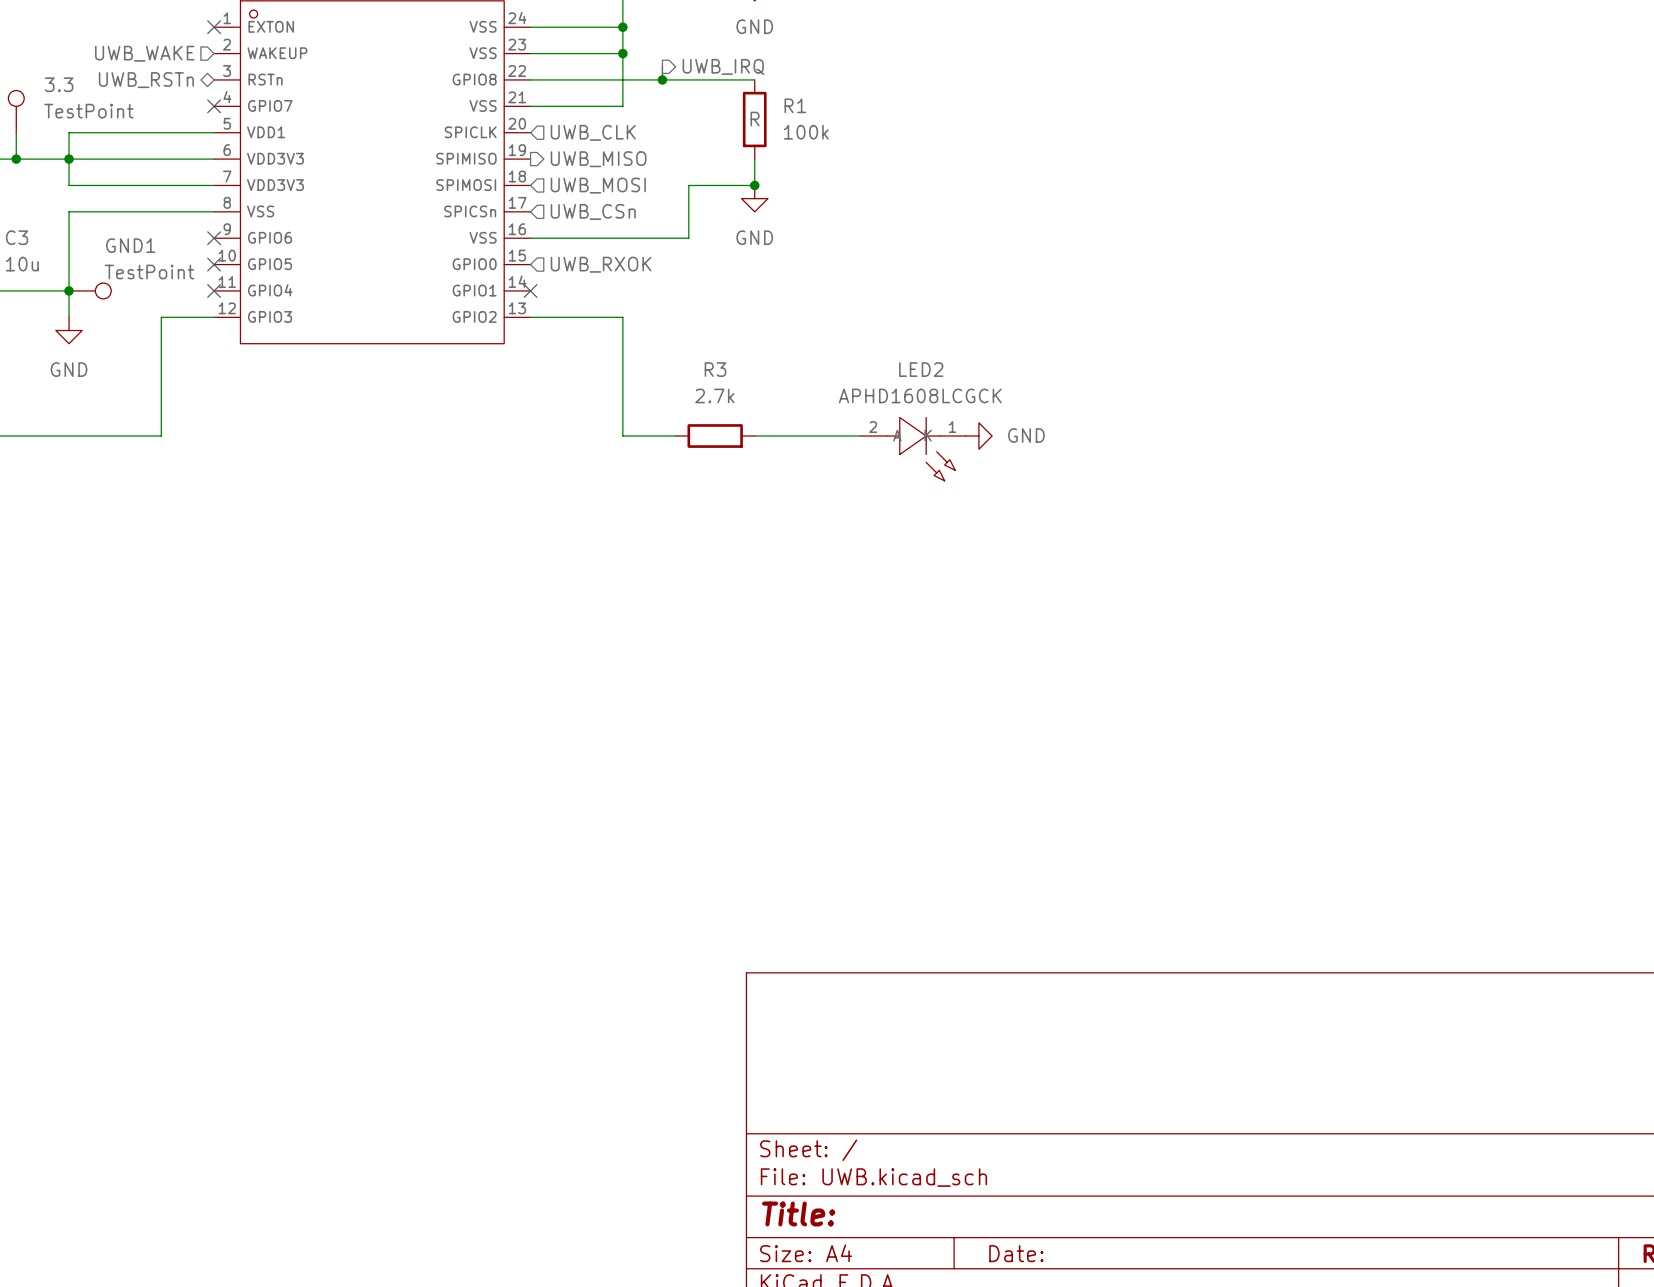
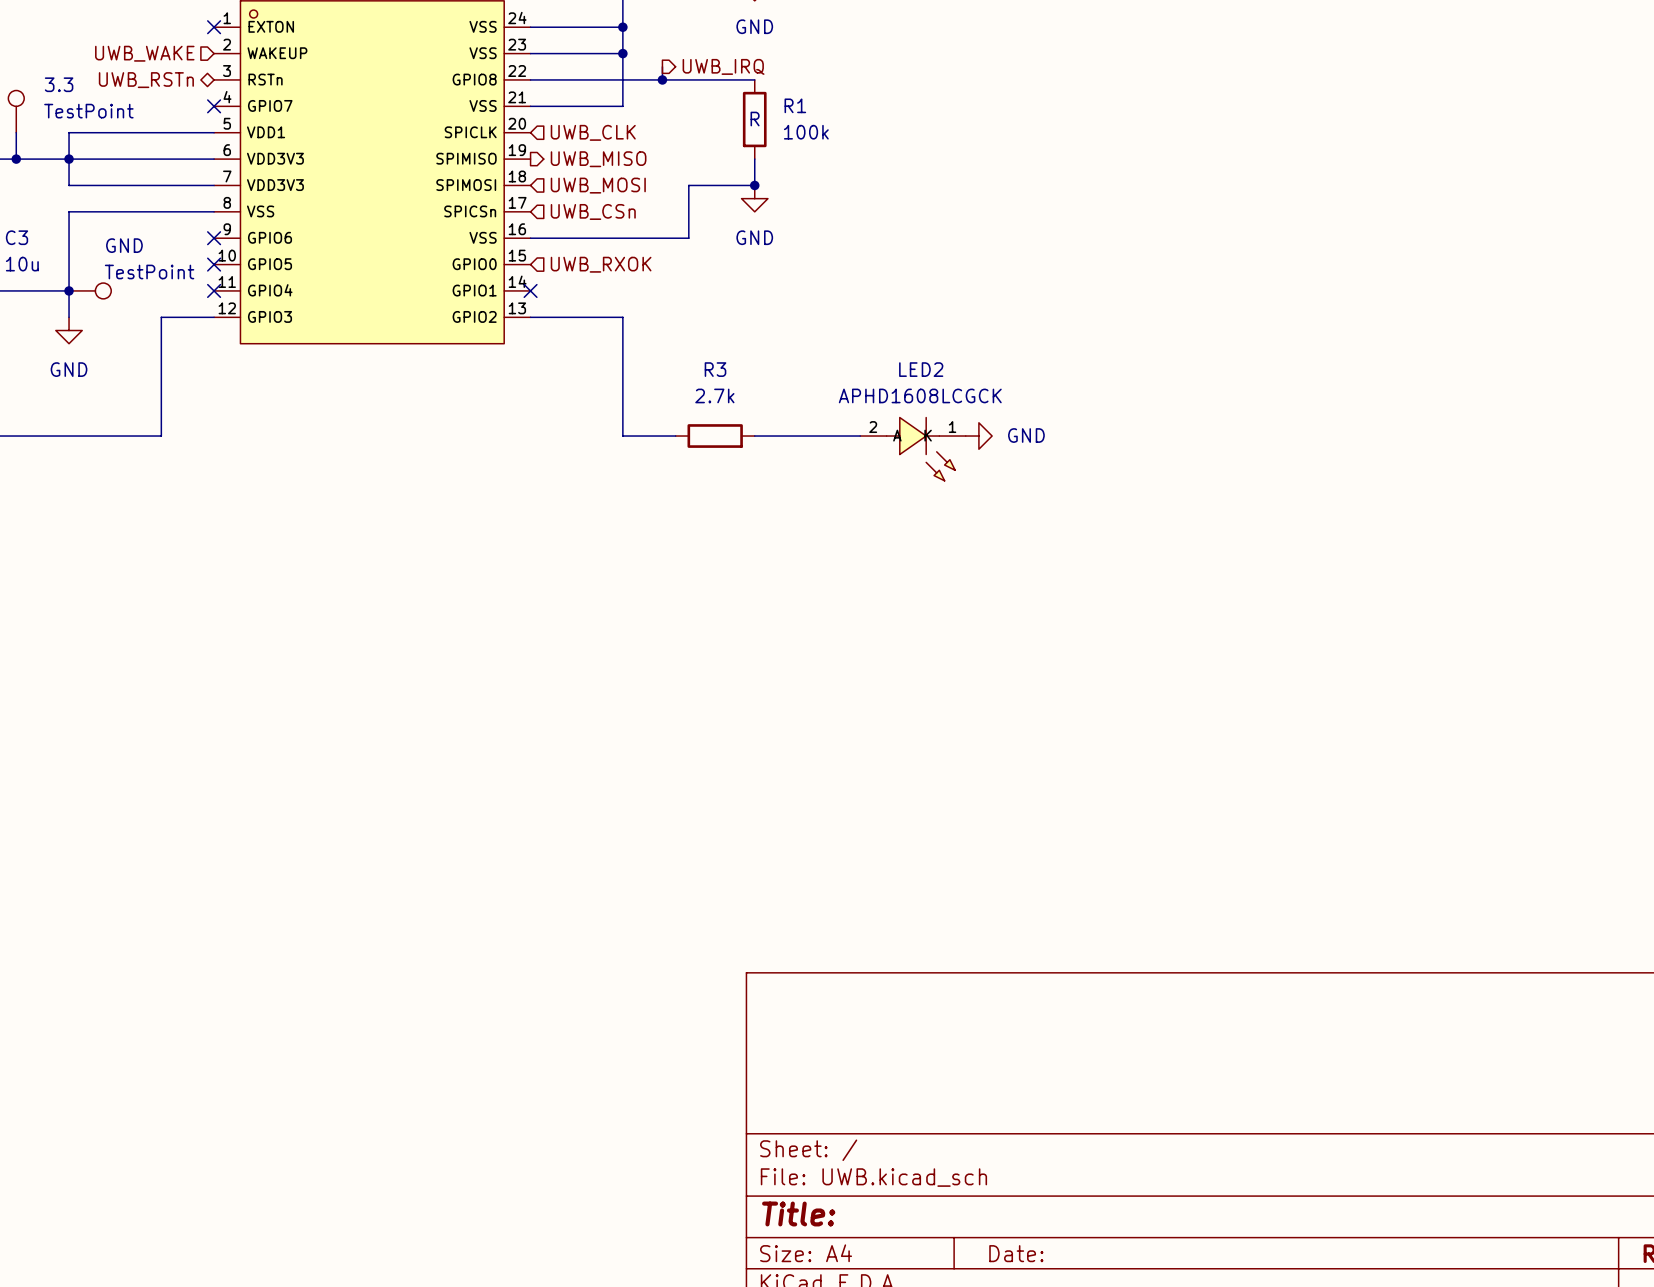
GND1 name: GND1 (130, 245) -> GND (124, 245)

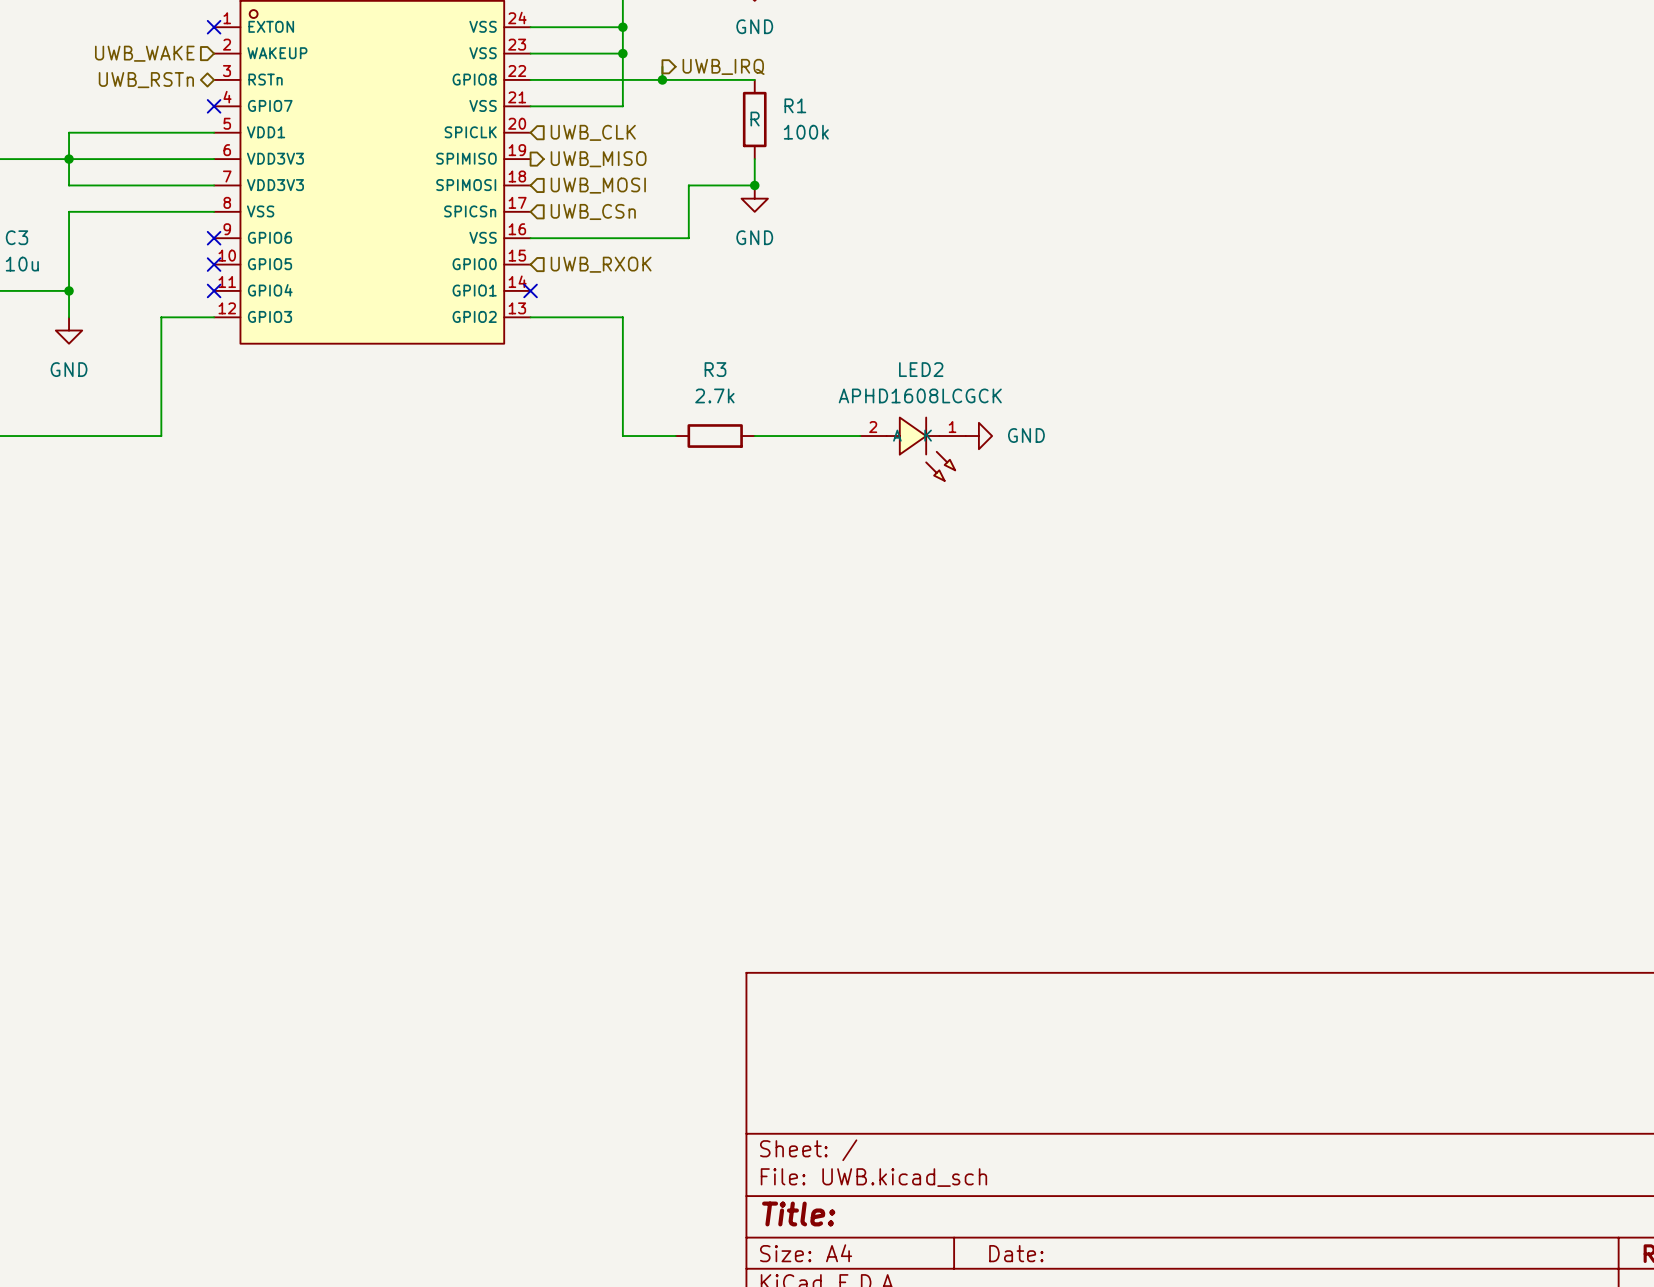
3.3: TestPoint (16, 111) -> none
wire: (16, 132) (16, 159) -> none
junction: (16, 159) -> none
GND: TestPoint (90, 290) -> none

